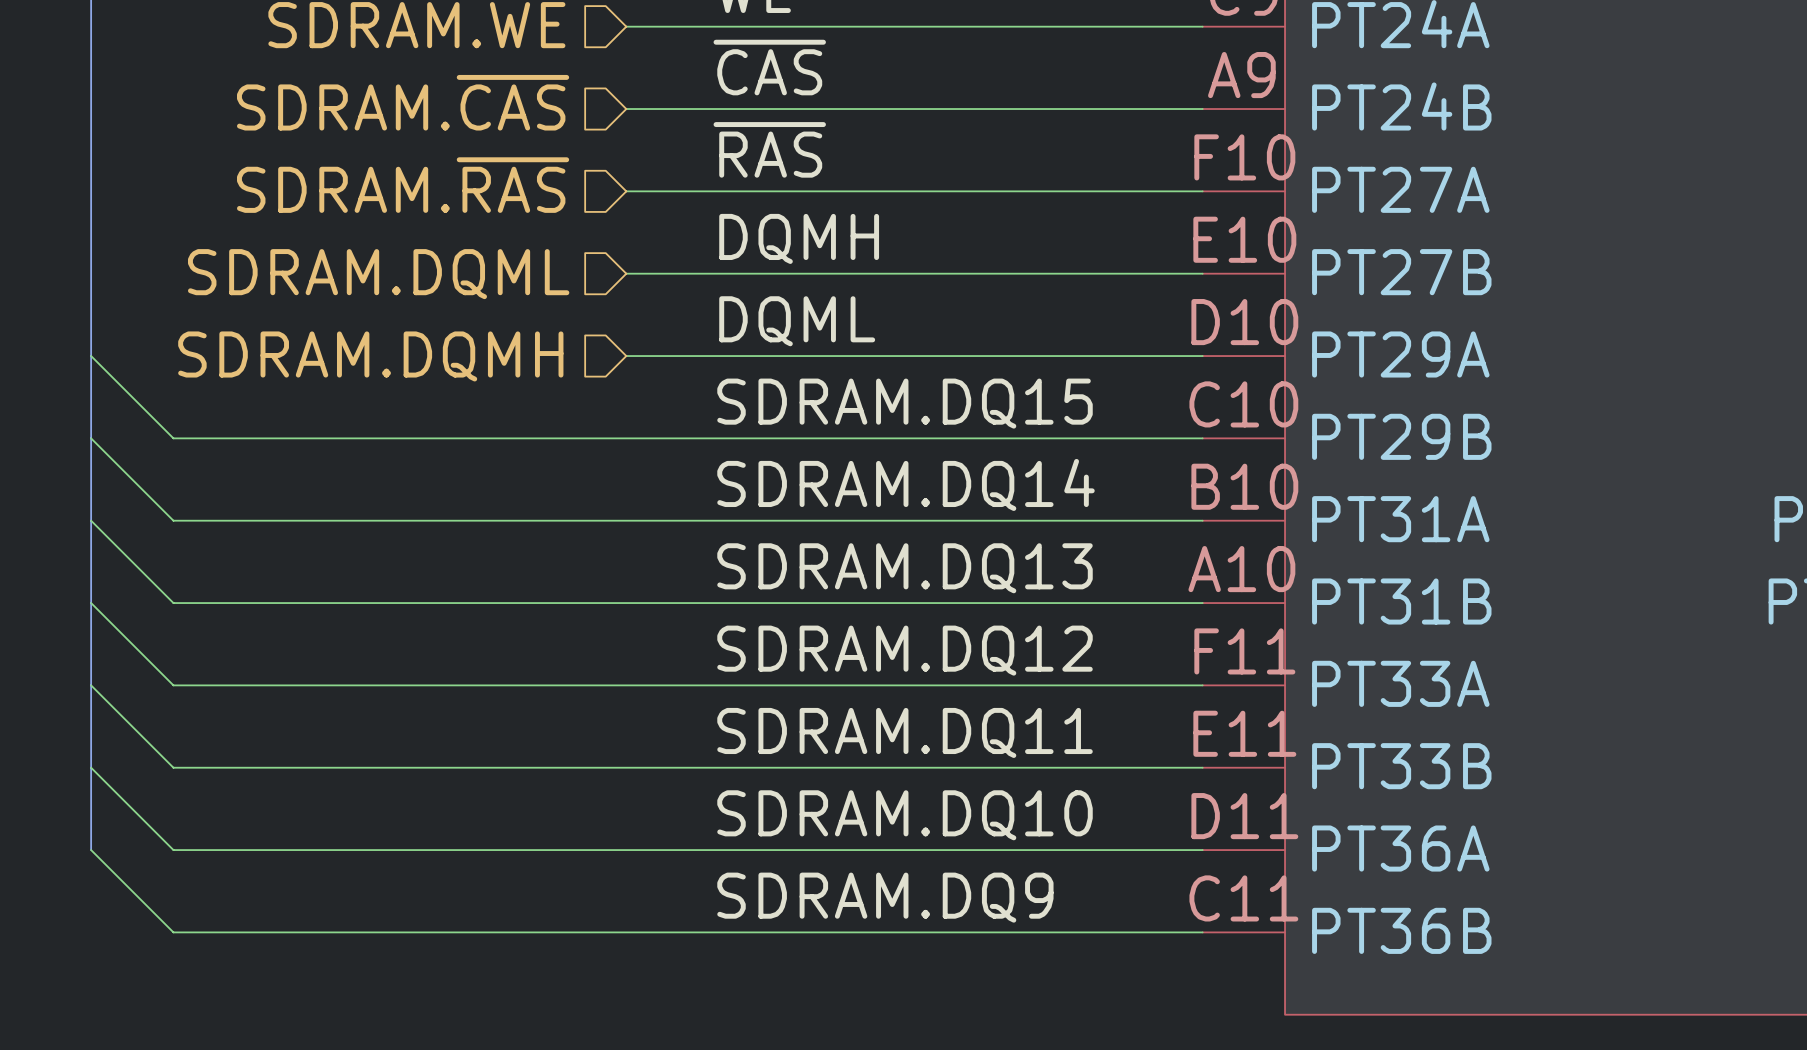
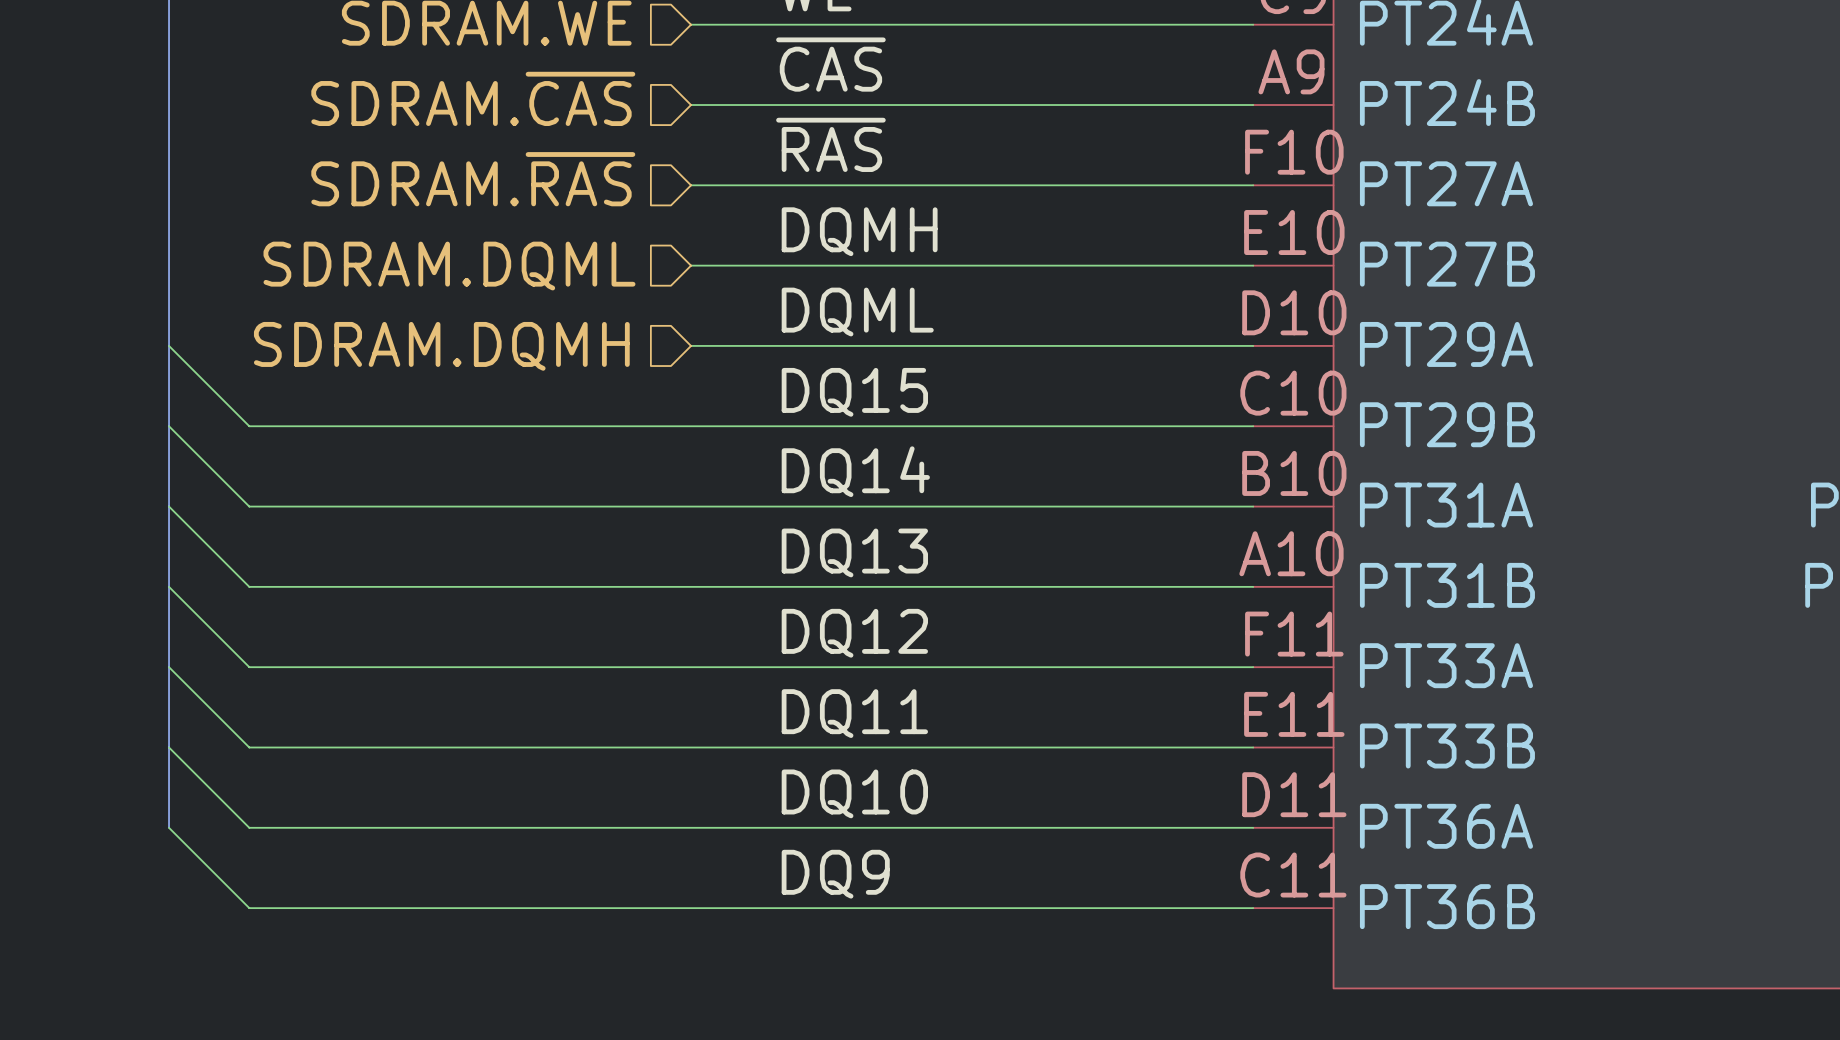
label: SDRAM.DQ15 (905, 403) -> DQ15 (854, 392)
label: SDRAM.DQ14 (905, 484) -> DQ14 (855, 471)
label: SDRAM.DQ13 (905, 568) -> DQ13 (854, 552)
label: SDRAM.DQ12 (905, 650) -> DQ12 (854, 633)
label: SDRAM.DQ11 (905, 732) -> DQ11 (854, 713)
label: SDRAM.DQ10 (905, 815) -> DQ10 (854, 793)
label: SDRAM.DQ9 (885, 897) -> DQ9 (835, 874)

